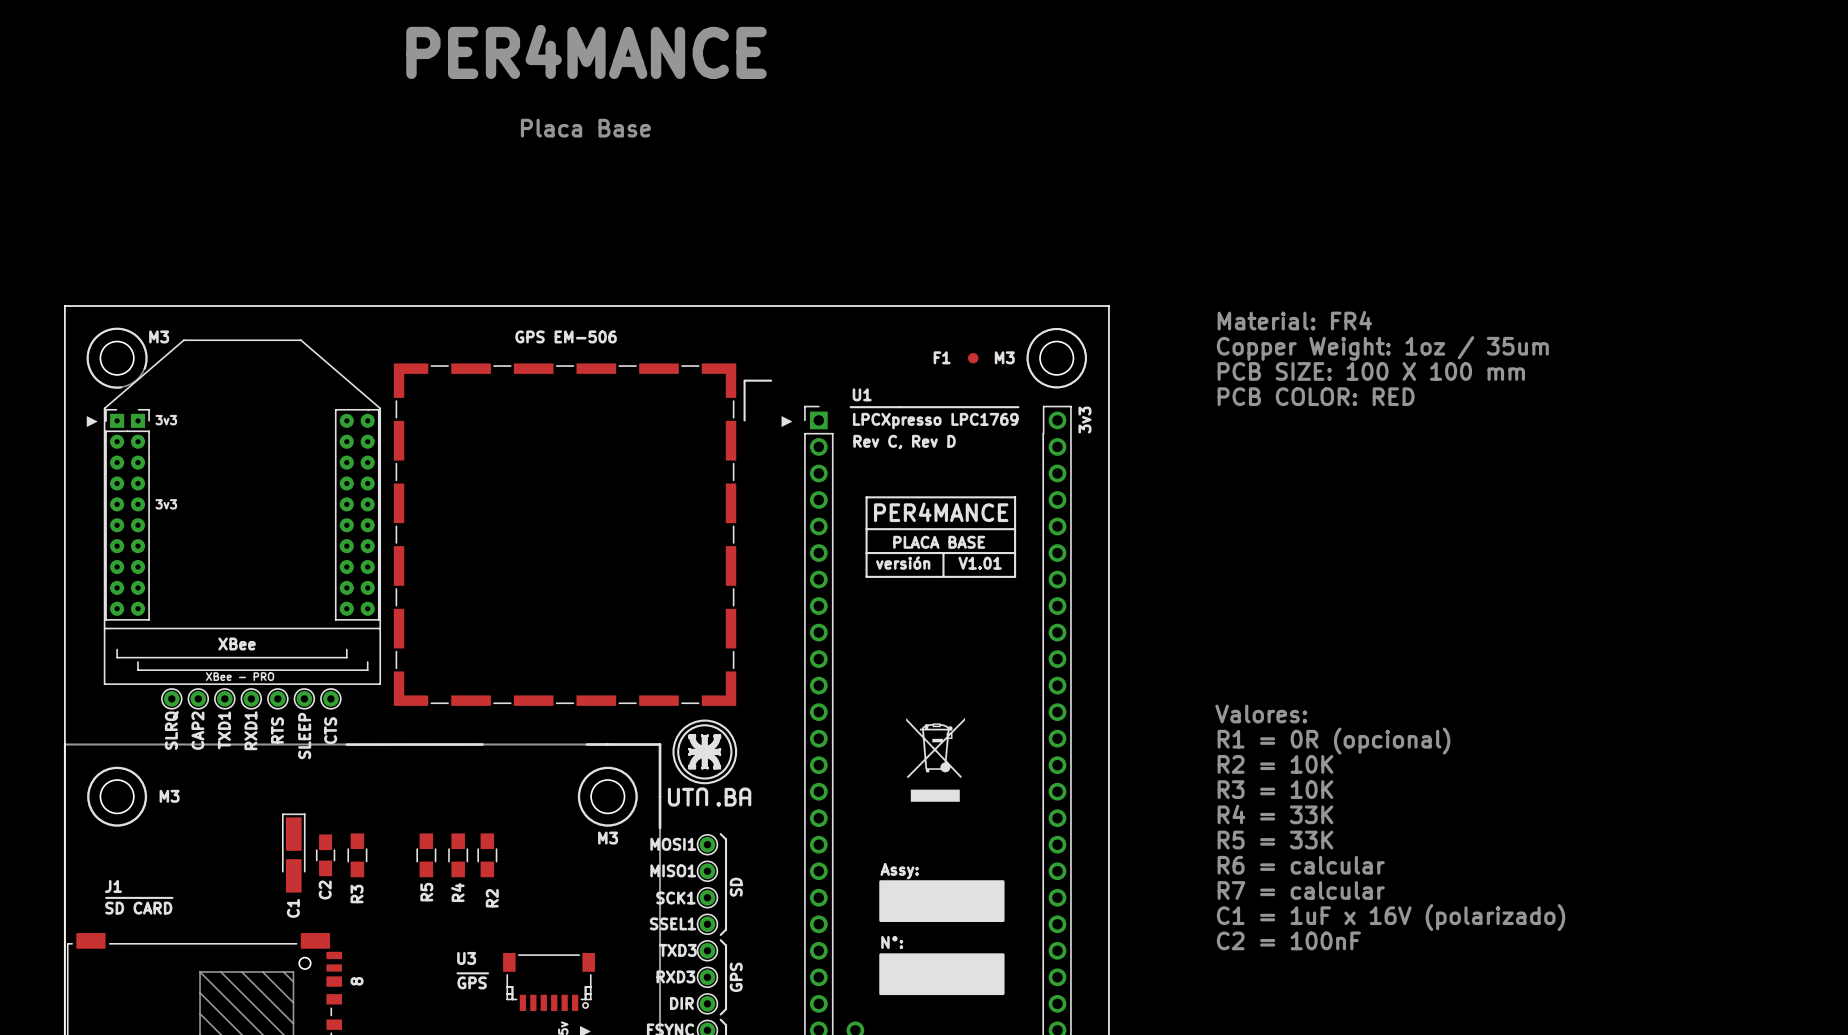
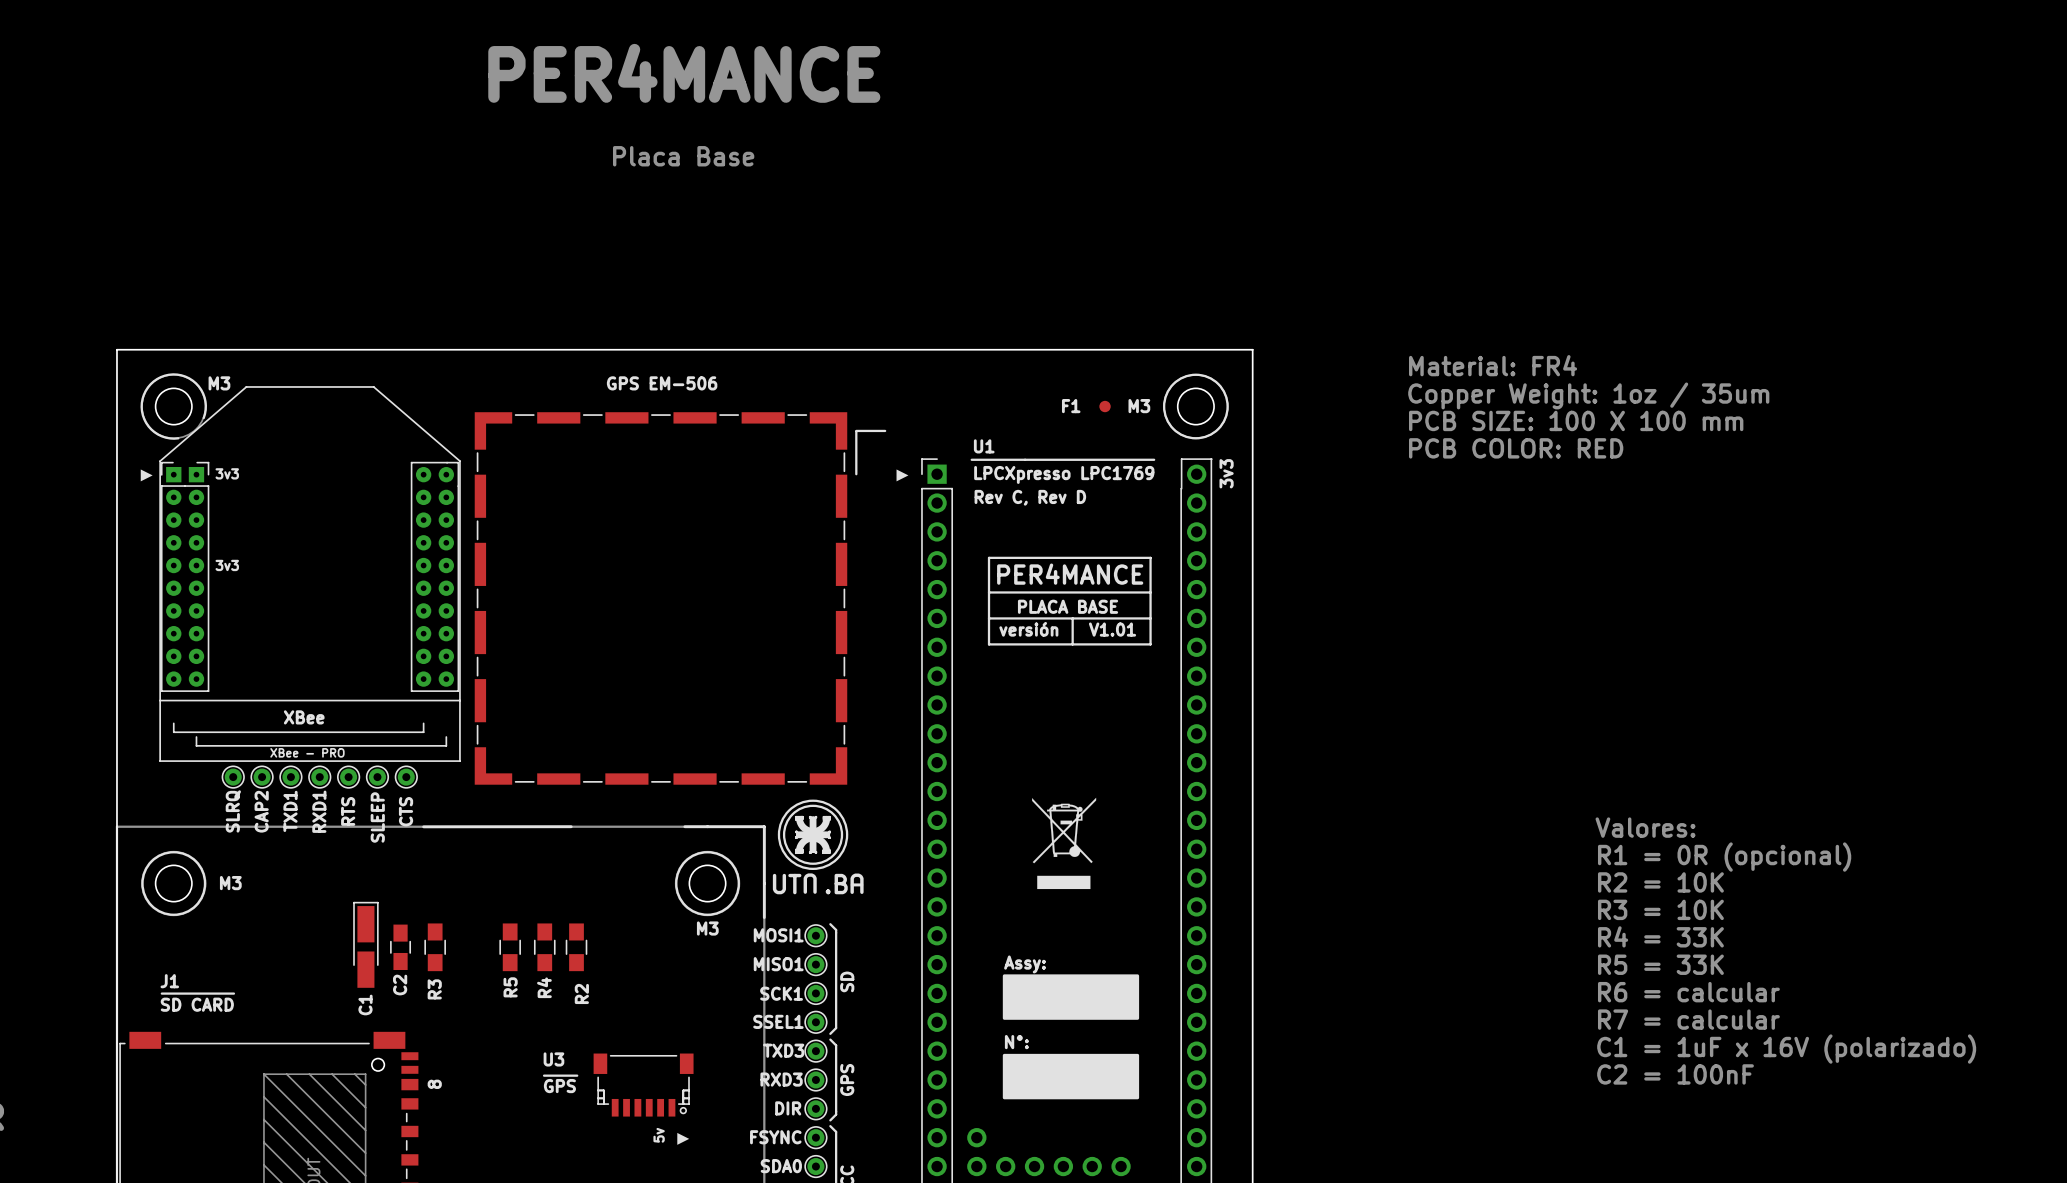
text position: Material: FR4 (1294, 320) -> Material: FR4 (1493, 365)
text position: Copper Weight: 1oz / 35um (1382, 348) -> Copper Weight: 1oz / 35um (1588, 395)
text position: PCB SIZE: 100 X 100 mm (1371, 371) -> PCB SIZE: 100 X 100 mm (1576, 420)
text position: PCB COLOR: RED (1316, 396) -> PCB COLOR: RED (1516, 448)
text position: Valores: (1261, 713) -> Valores: (1645, 827)
text position: R1 = 0R (opcional) (1333, 741) -> R1 = 0R (opcional) (1724, 857)
text position: R2 = 10K (1275, 764) -> R2 = 10K (1660, 882)
text position: R3 = 10K (1275, 789) -> R3 = 10K (1660, 909)
text position: R4 = 33K (1275, 814) -> R4 = 33K (1660, 936)
text position: R5 = 33K (1275, 840) -> R5 = 33K (1660, 964)
text position: R6 = calcular (1301, 865) -> R6 = calcular (1688, 992)
text position: R7 = calcular (1301, 890) -> R7 = calcular (1688, 1019)
text position: C1 = 1uF x 16V (polarizado) (1391, 917) -> C1 = 1uF x 16V (polarizado) (1786, 1049)
text position: C2 = 100nF (1288, 940) -> C2 = 100nF (1675, 1074)

